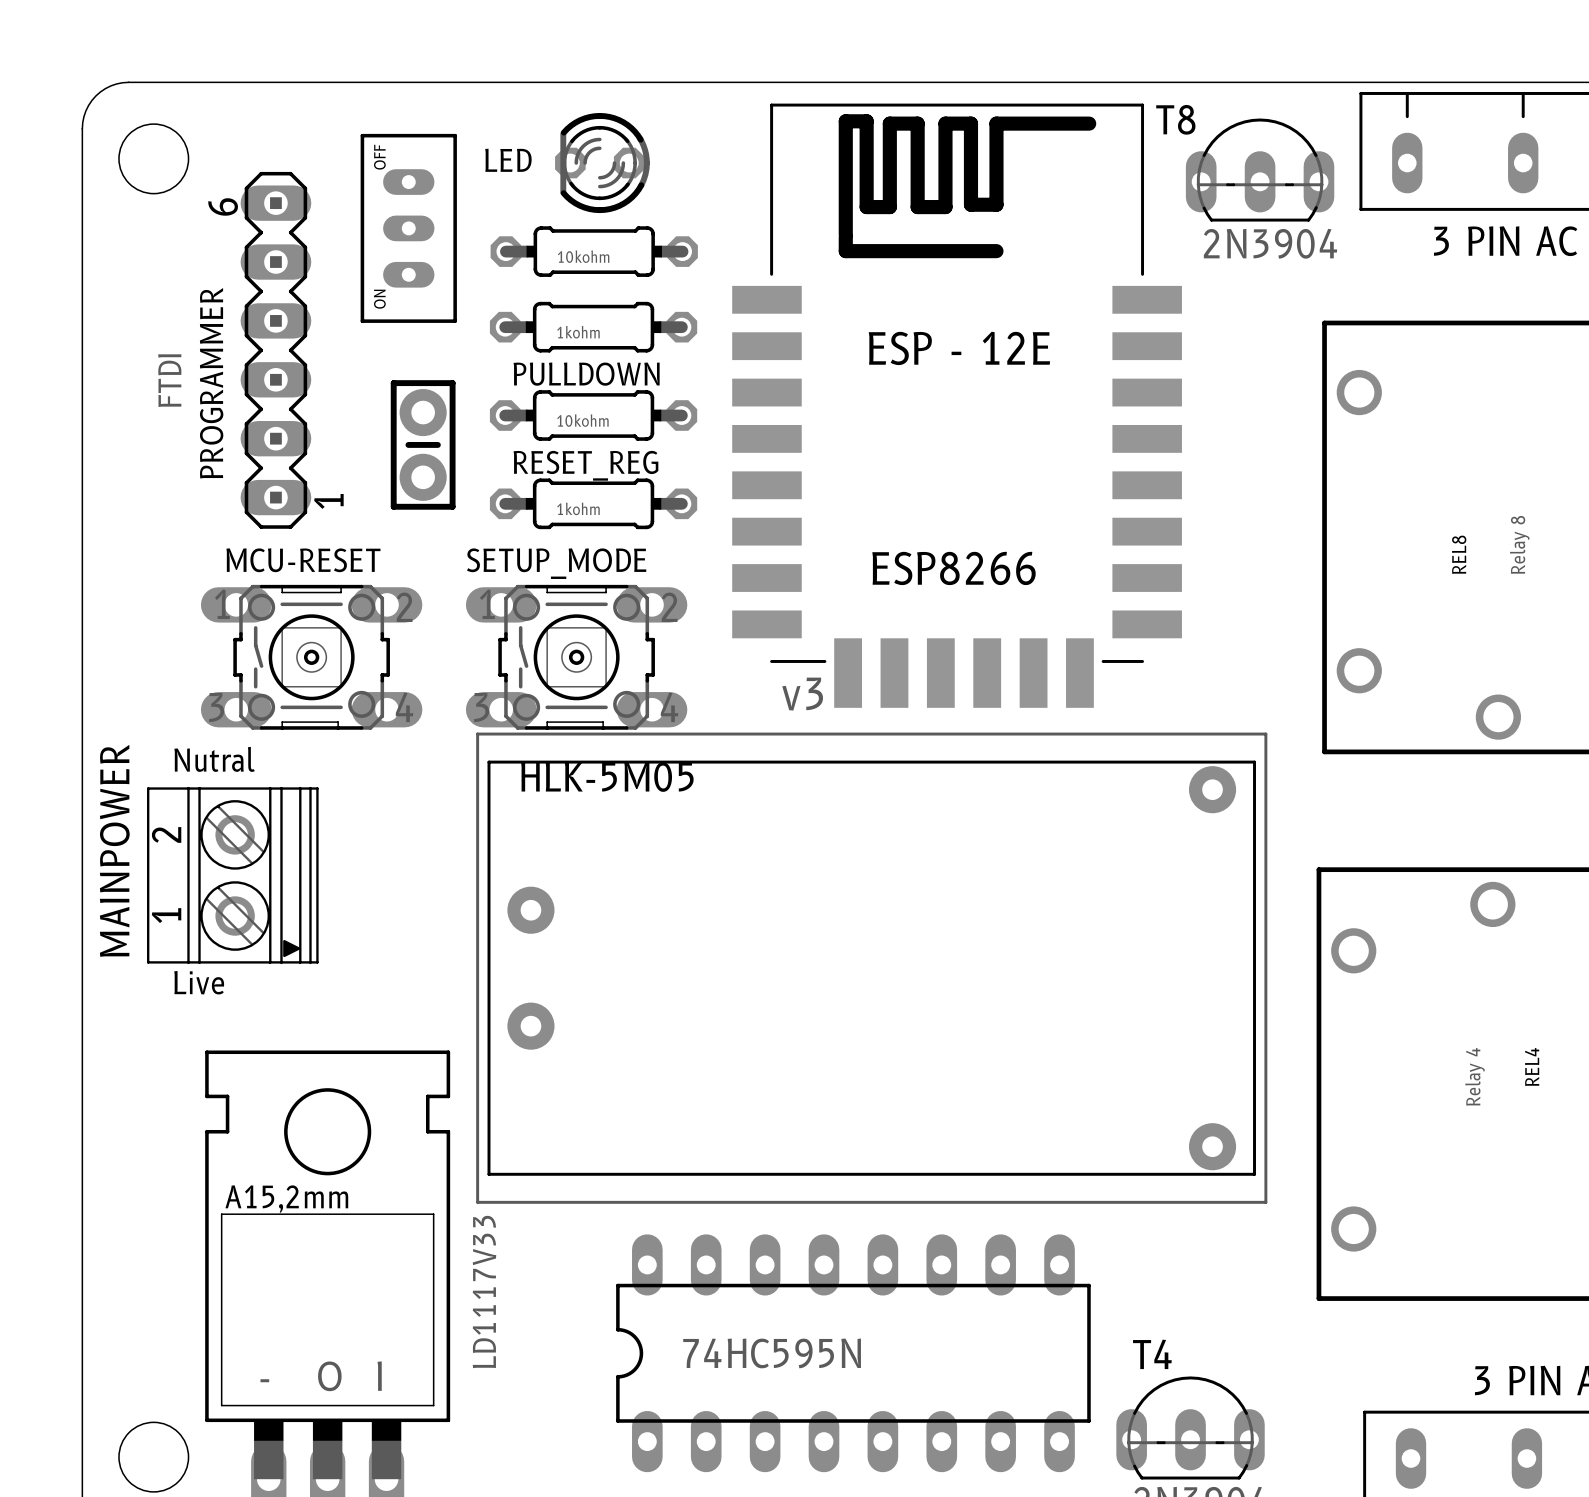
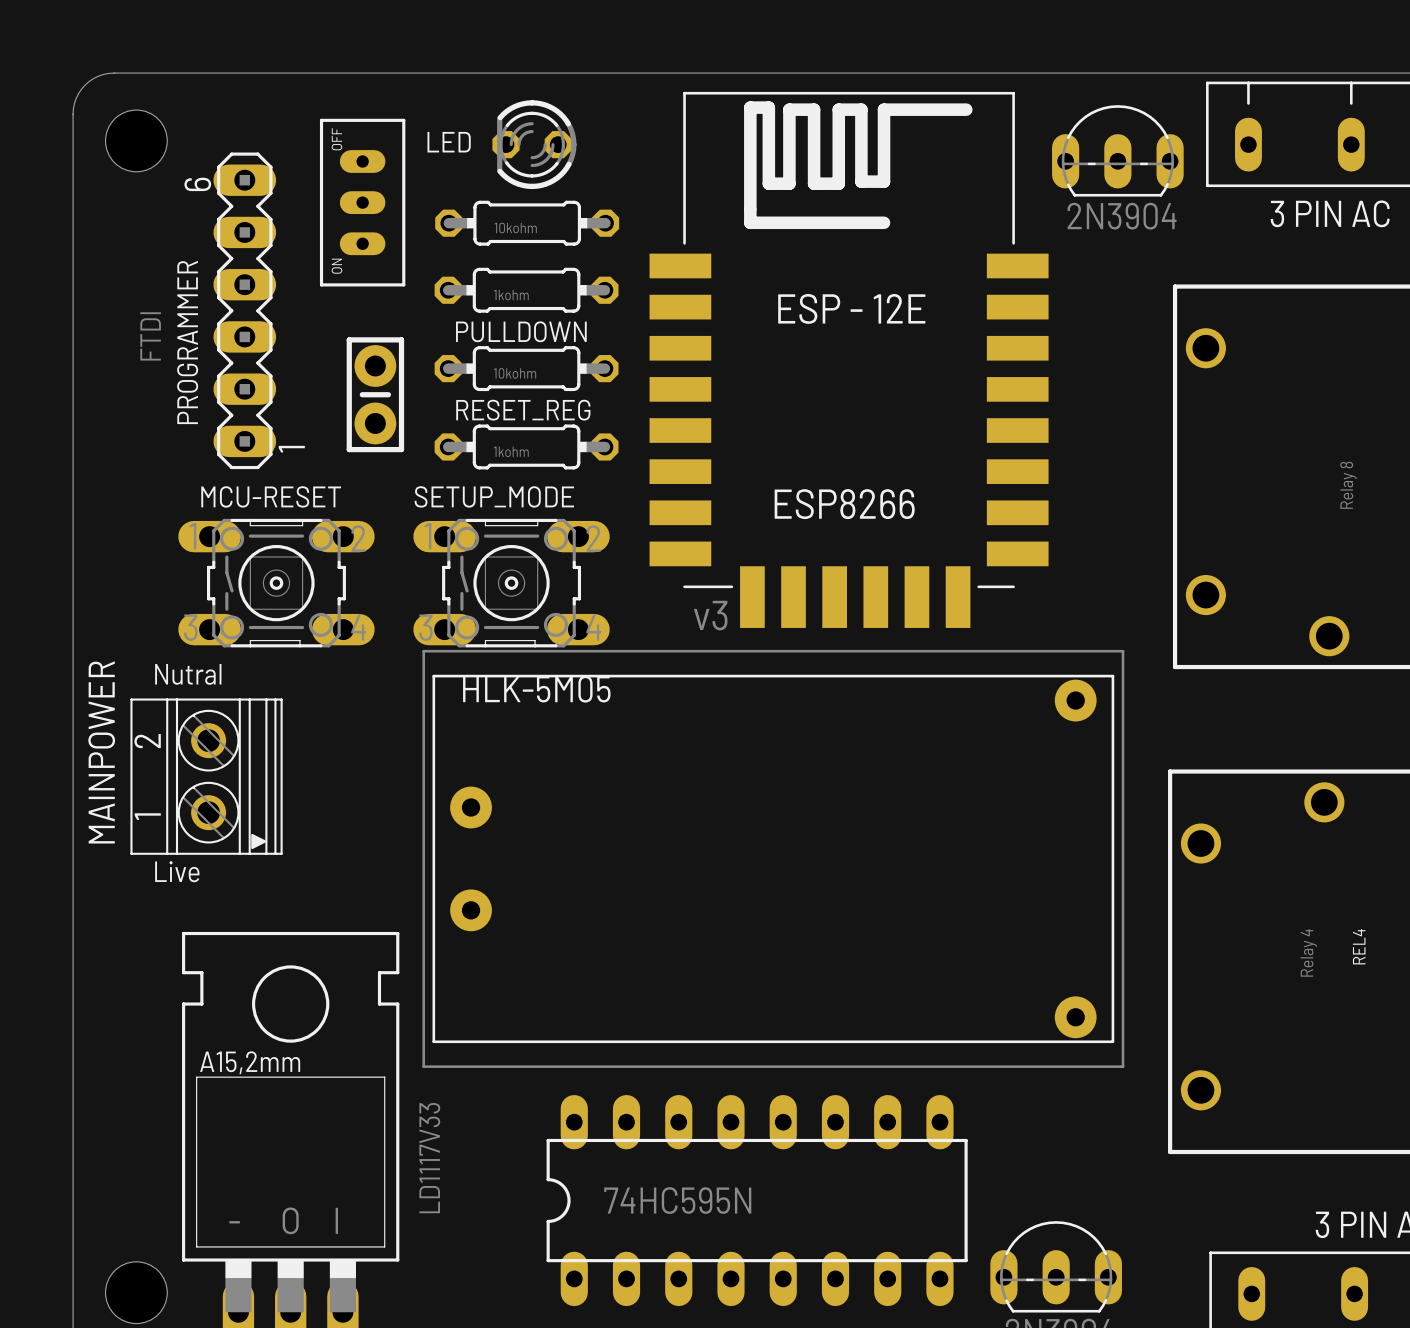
T8 name: T8 (1175, 119) -> none
REL8 name: REL8 (1459, 554) -> none
T4 name: T4 (1152, 1354) -> none

